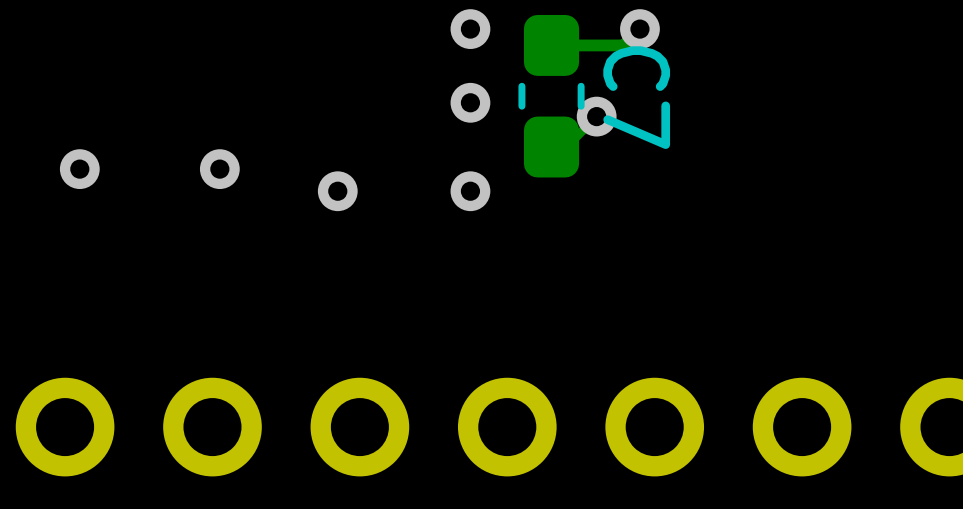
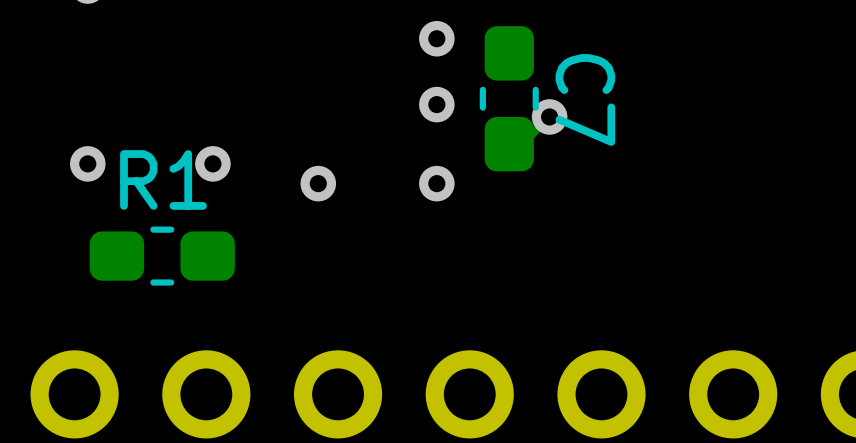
track: (639, 29) (623, 45) (551, 45) -> none
via: (639, 29) -> none
R1: none -> (162, 256)

